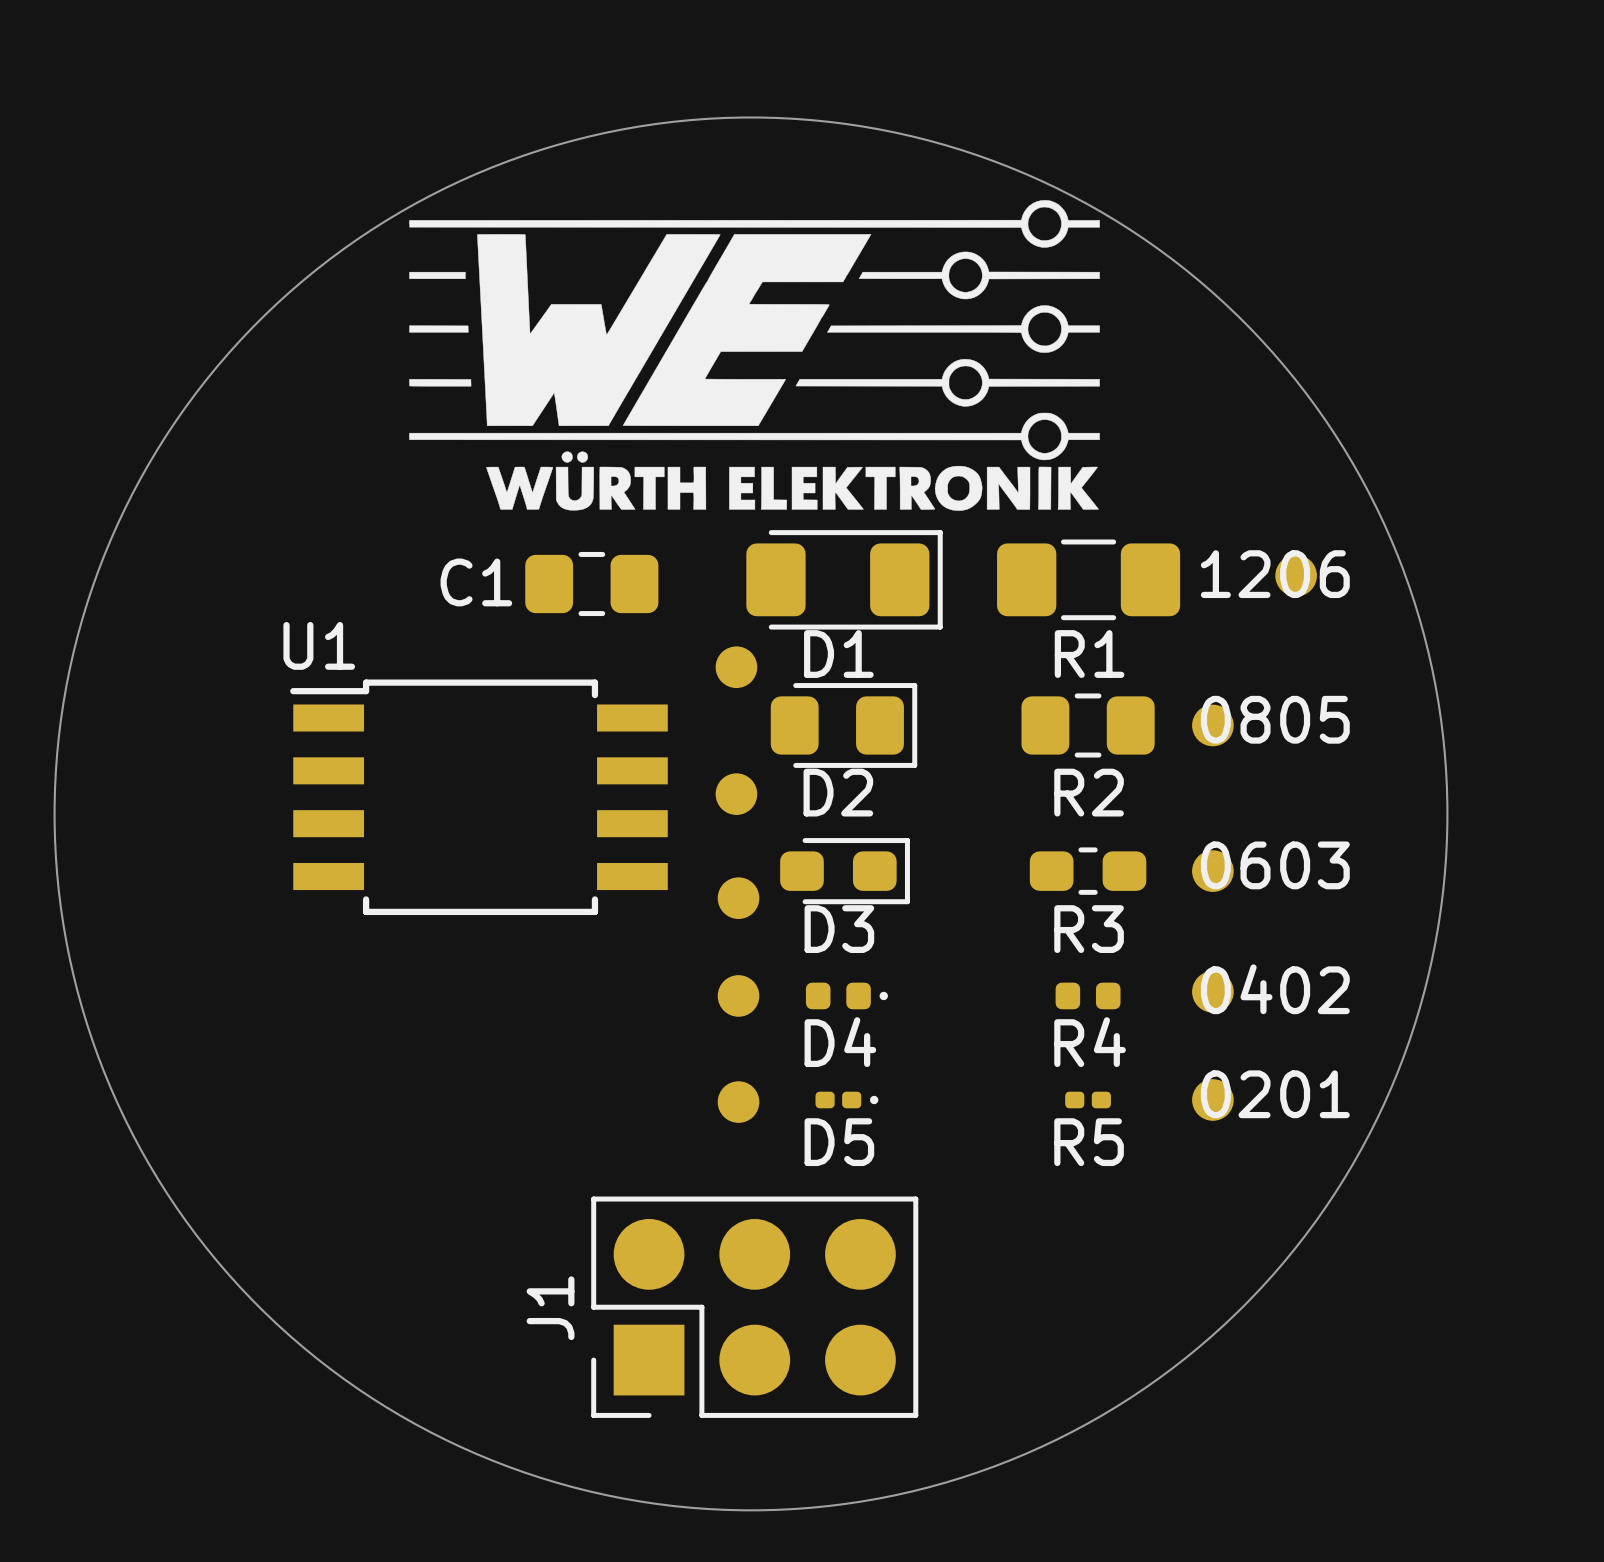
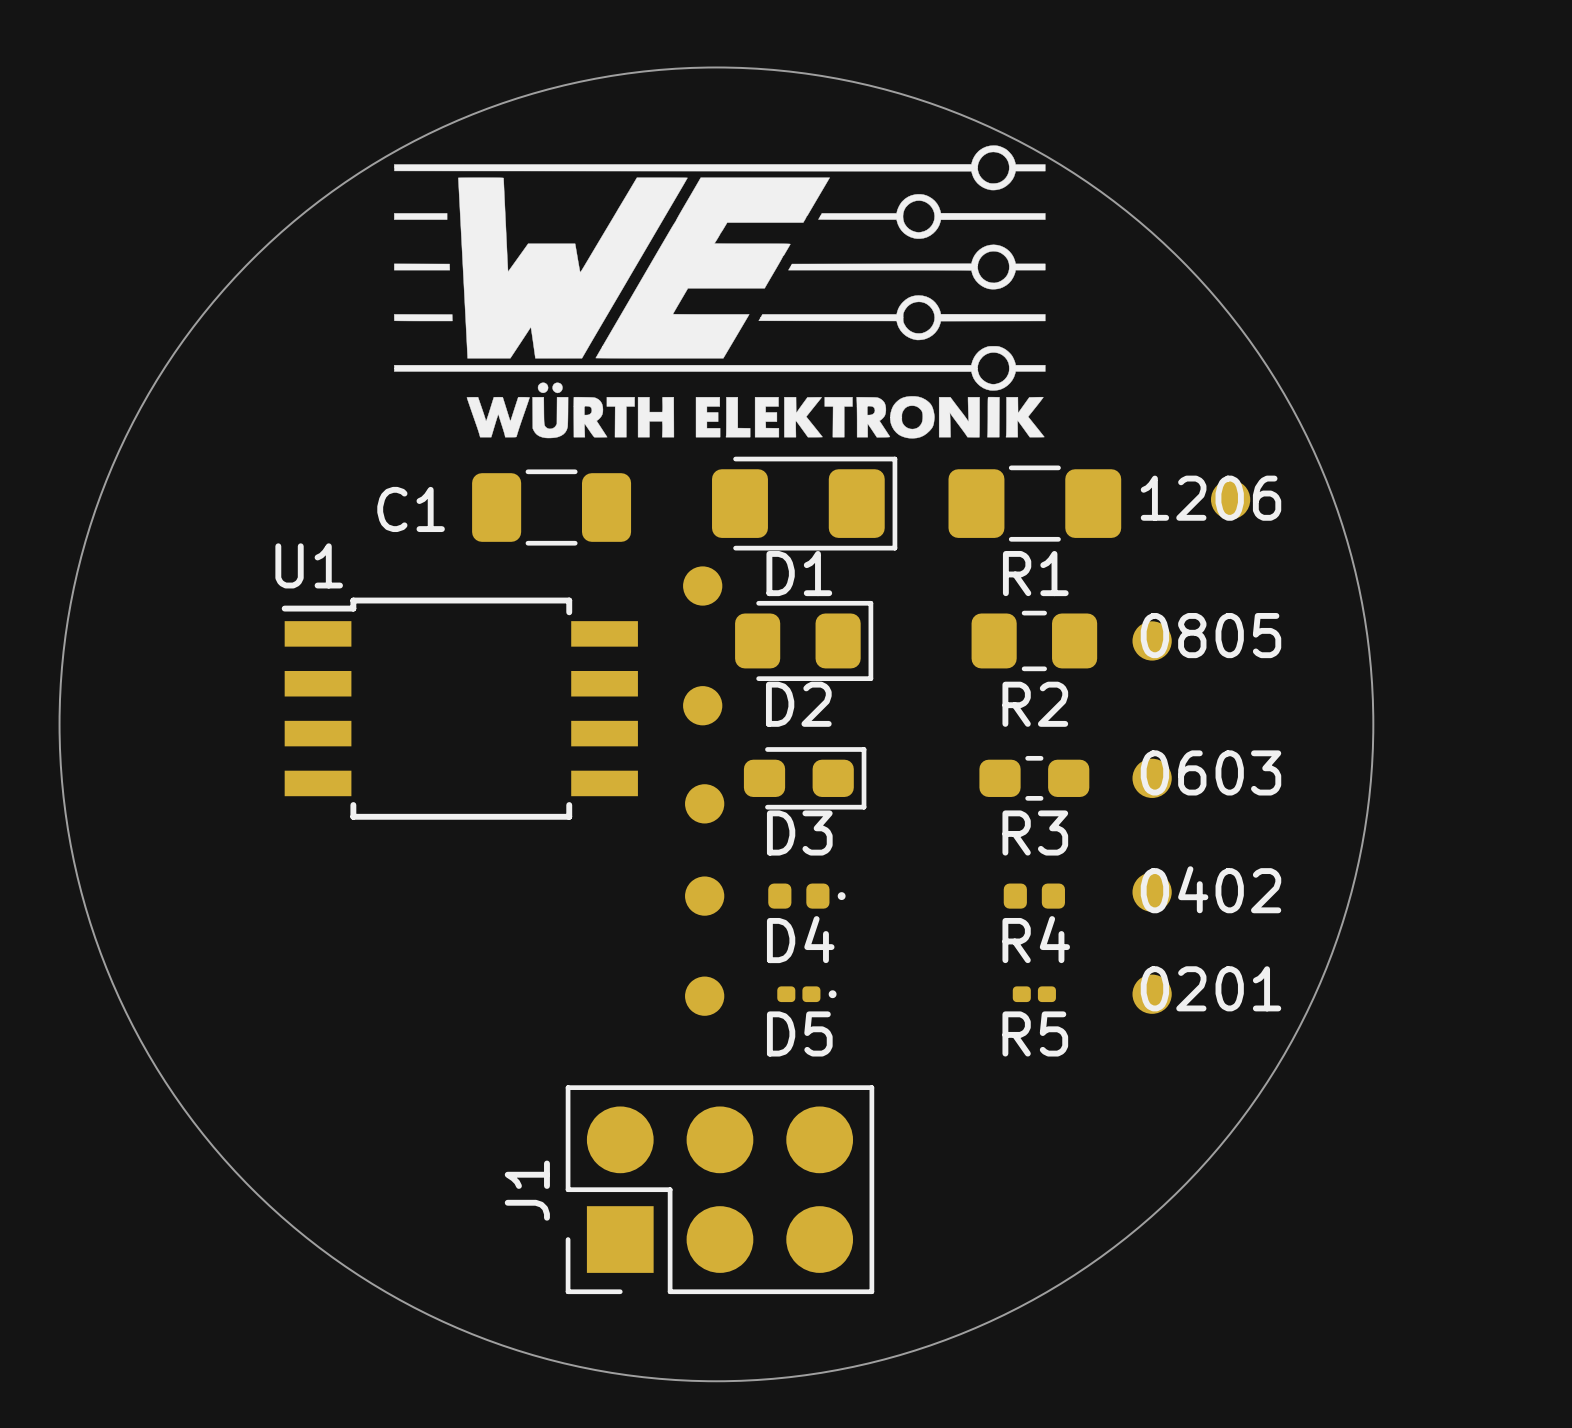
C1 footprint: [525, 551, 659, 617] -> [472, 469, 632, 546]
C1 name position: C1 (476, 582) -> C1 (411, 509)

